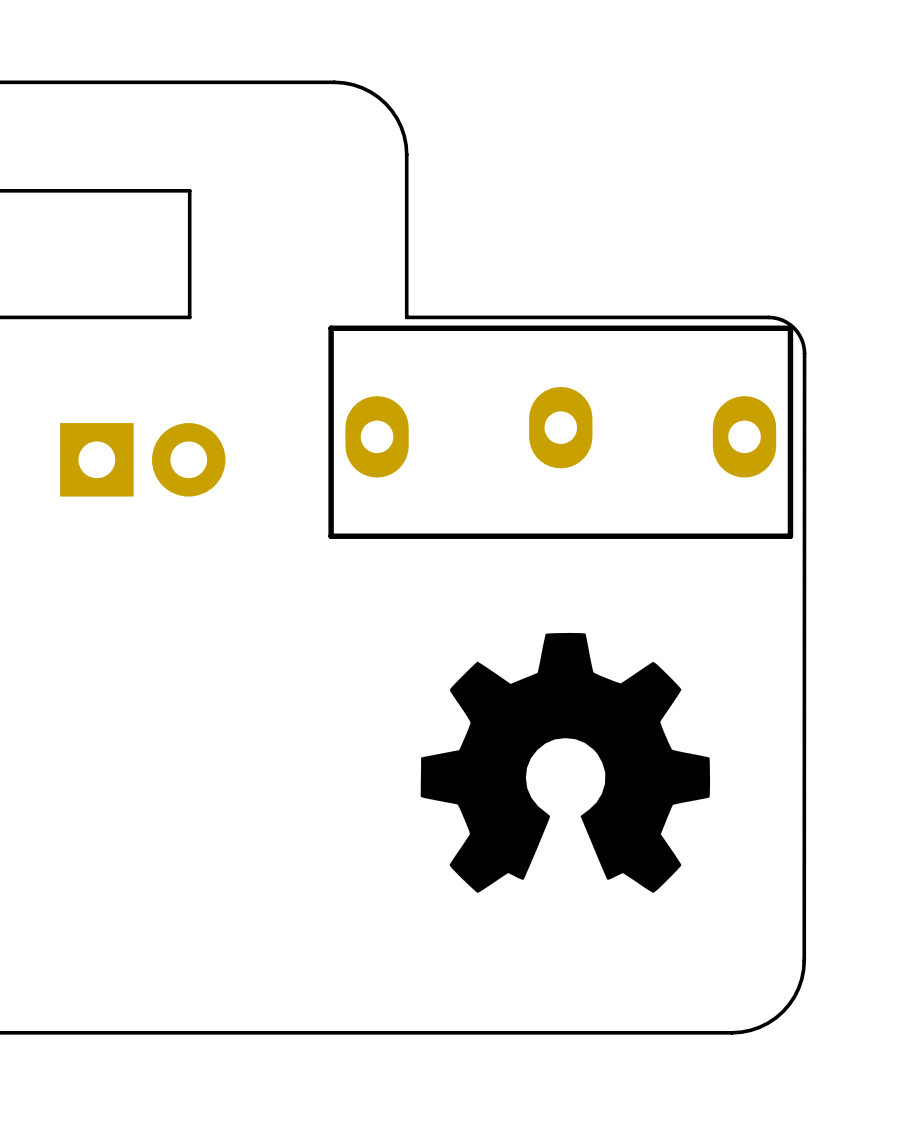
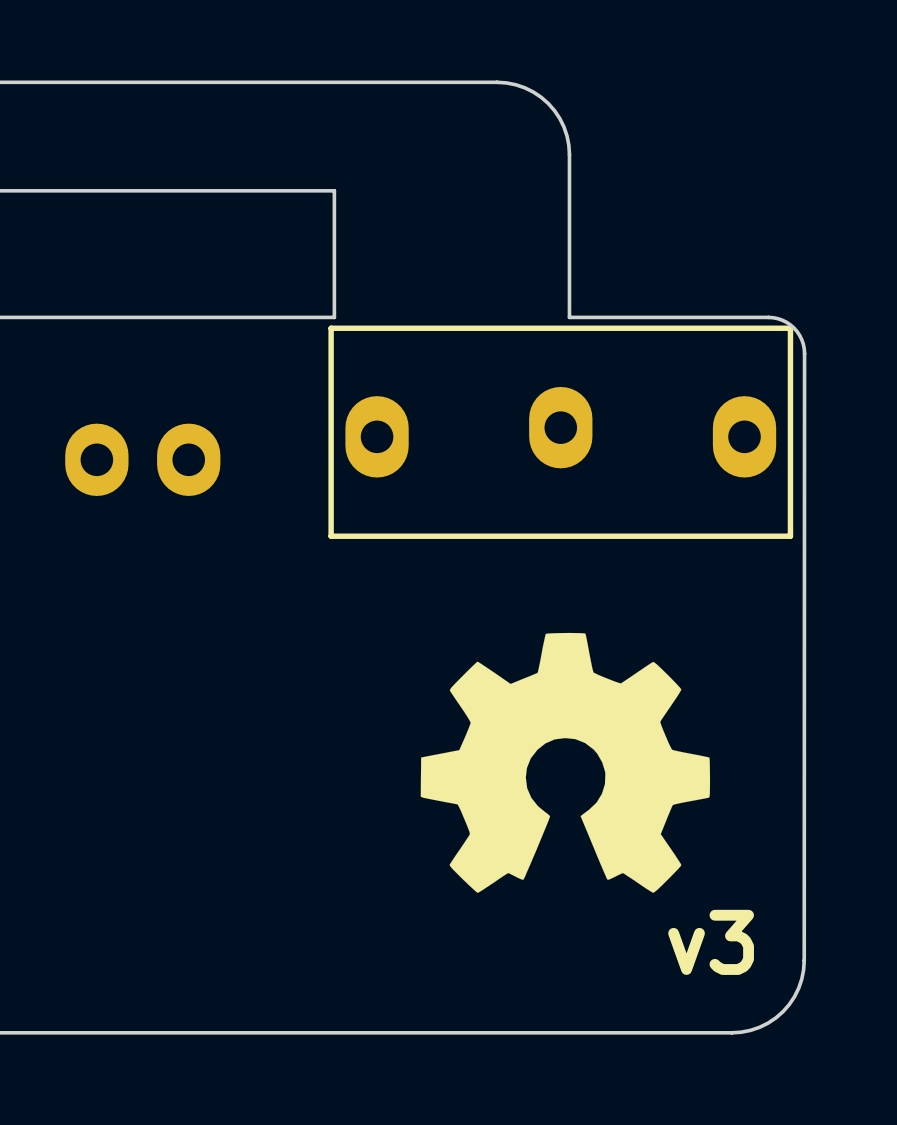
board edge: (334, 82) (353, 84) (378, 97) (391, 110) (404, 135) (406, 154) (406, 317) (569, 317) -> (334, 82) (506, 82) (533, 92) (548, 103) (563, 126) (568, 145) (569, 317)
board edge: (189, 190) (189, 317) -> (189, 190) (334, 190) (334, 317) (189, 317)
part footprint: [60, 423, 226, 497] -> [65, 423, 221, 496]
text: none -> v3 (711, 942)

